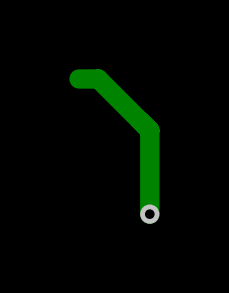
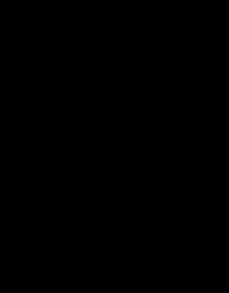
track: (78, 78) (98, 78) (149, 130) (149, 214) -> none
via: (149, 214) -> none

